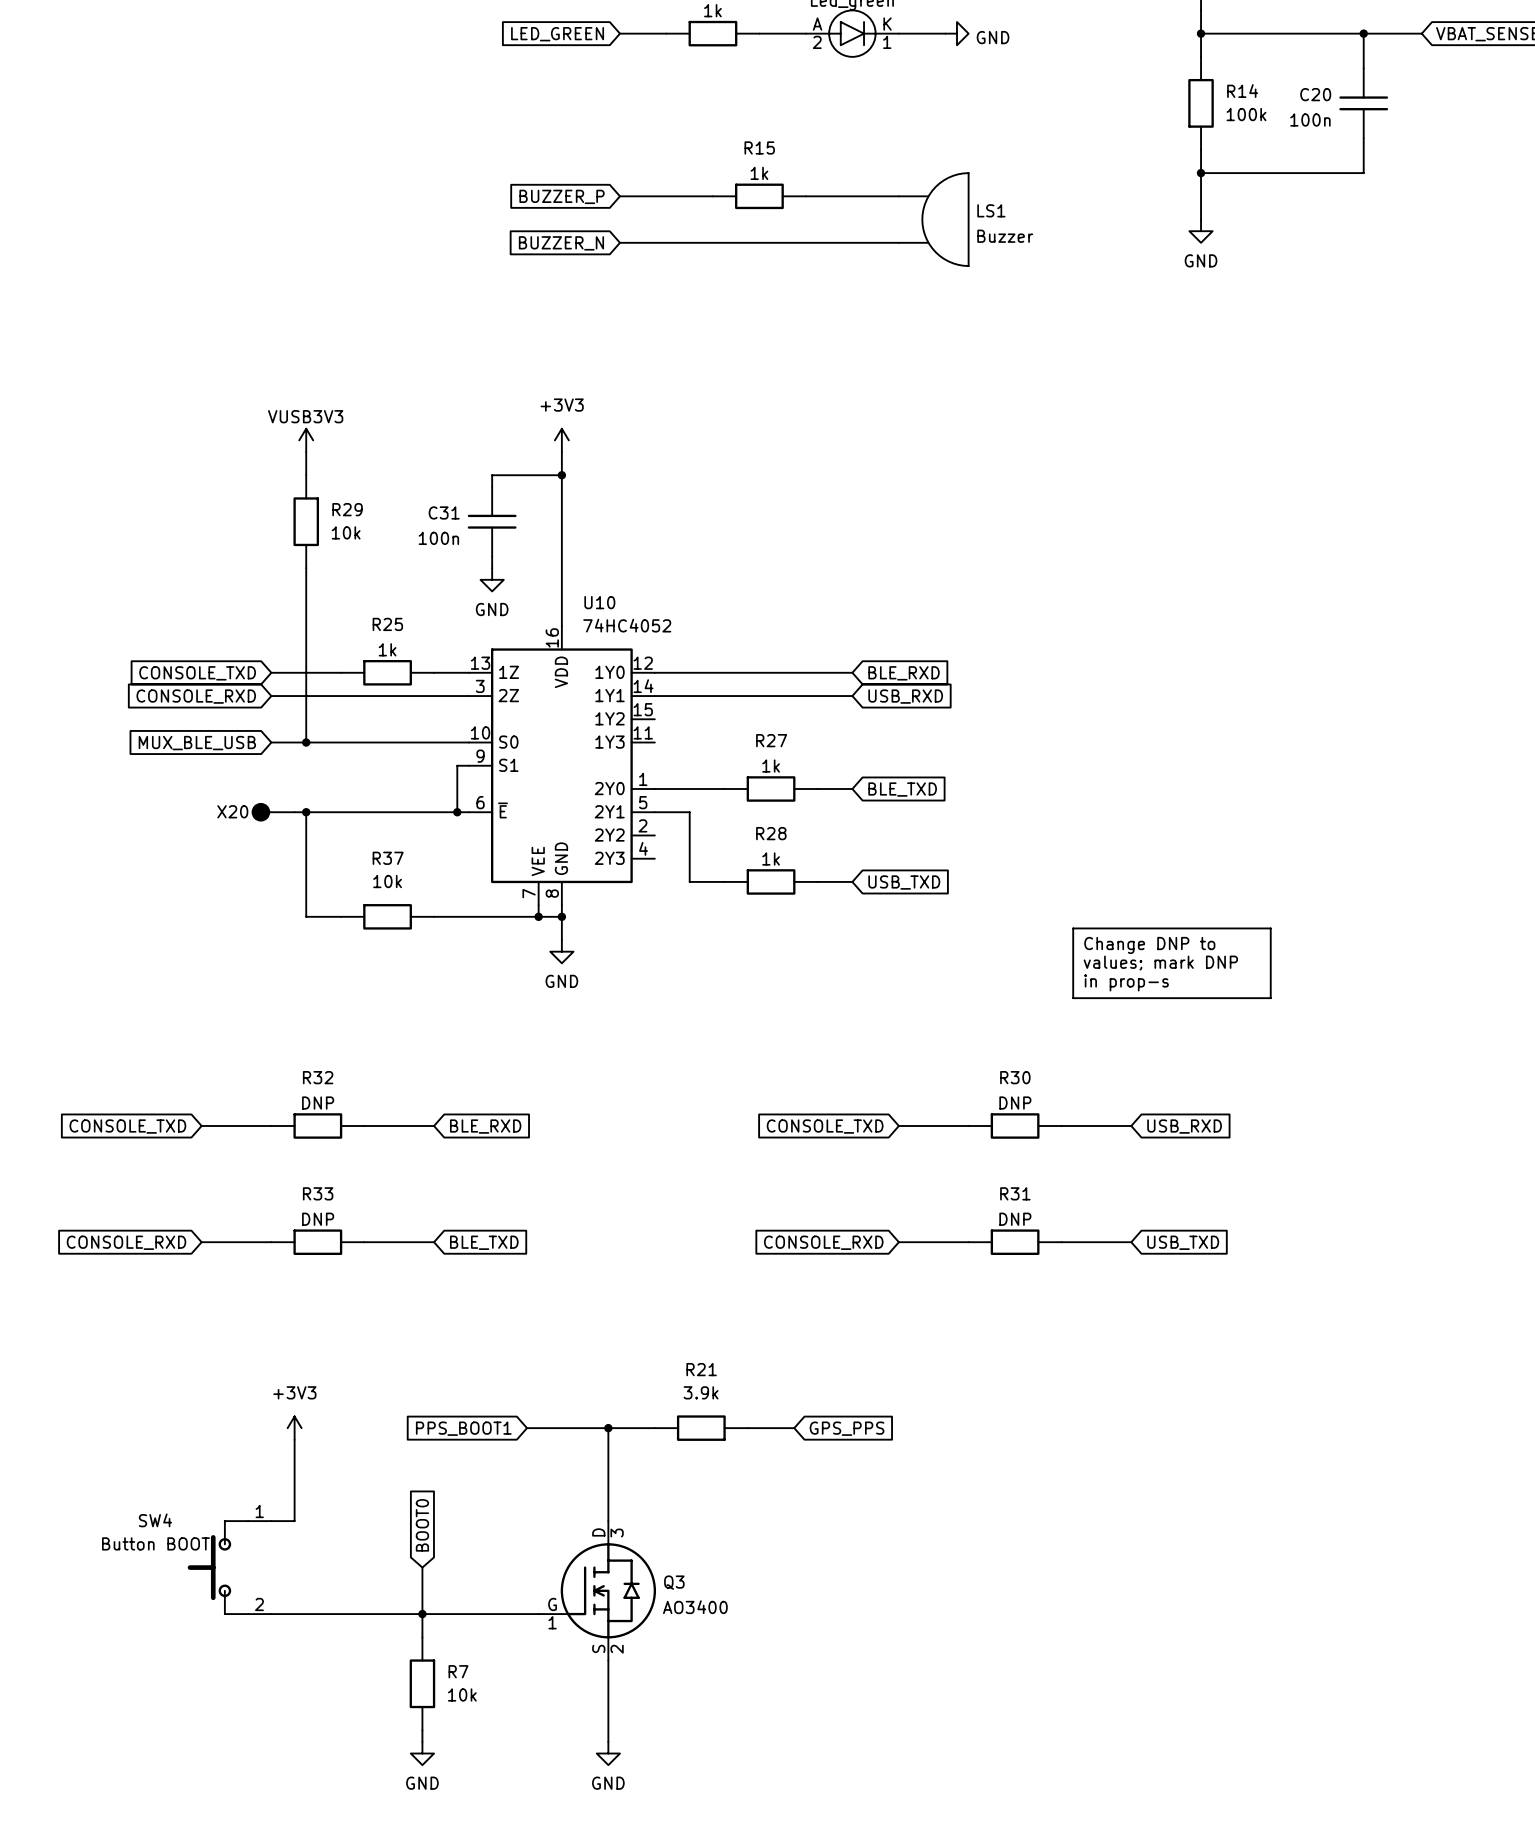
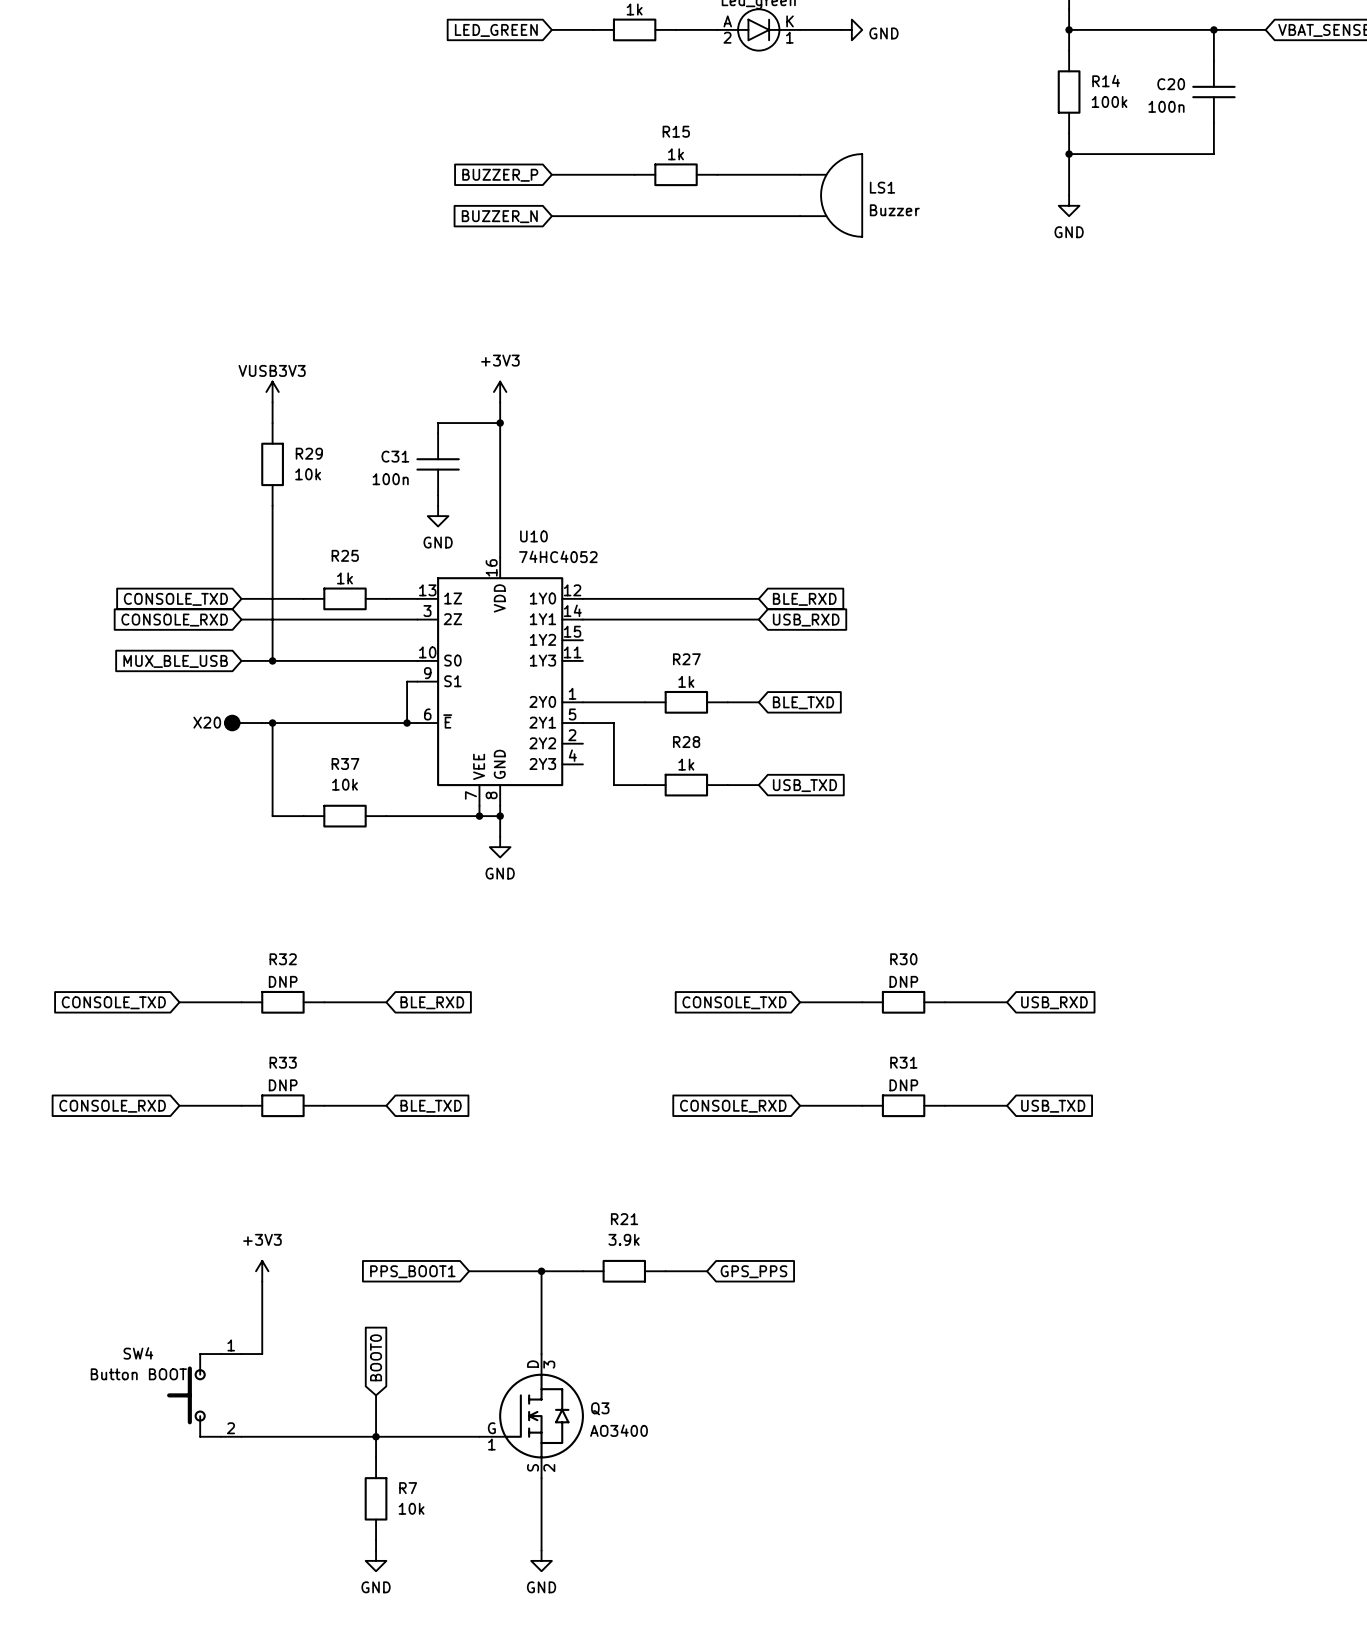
line: (1073, 928) (1270, 928) (1270, 998) (1073, 998) (1073, 928) -> none
text: Change DNP to (1149, 945) -> none
text: values; mark DNP (1160, 963) -> none
text: in prop-s (1126, 982) -> none

